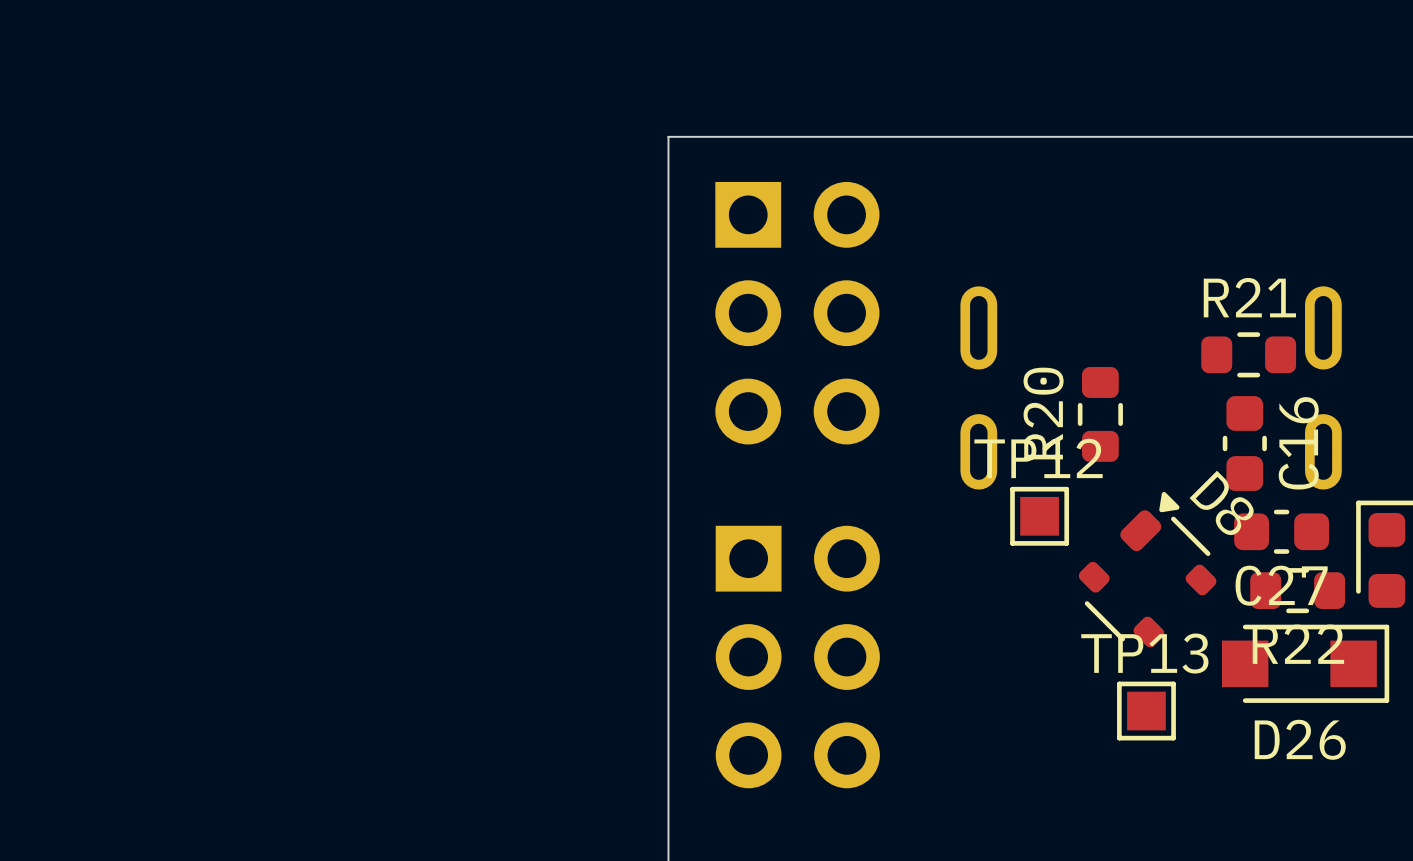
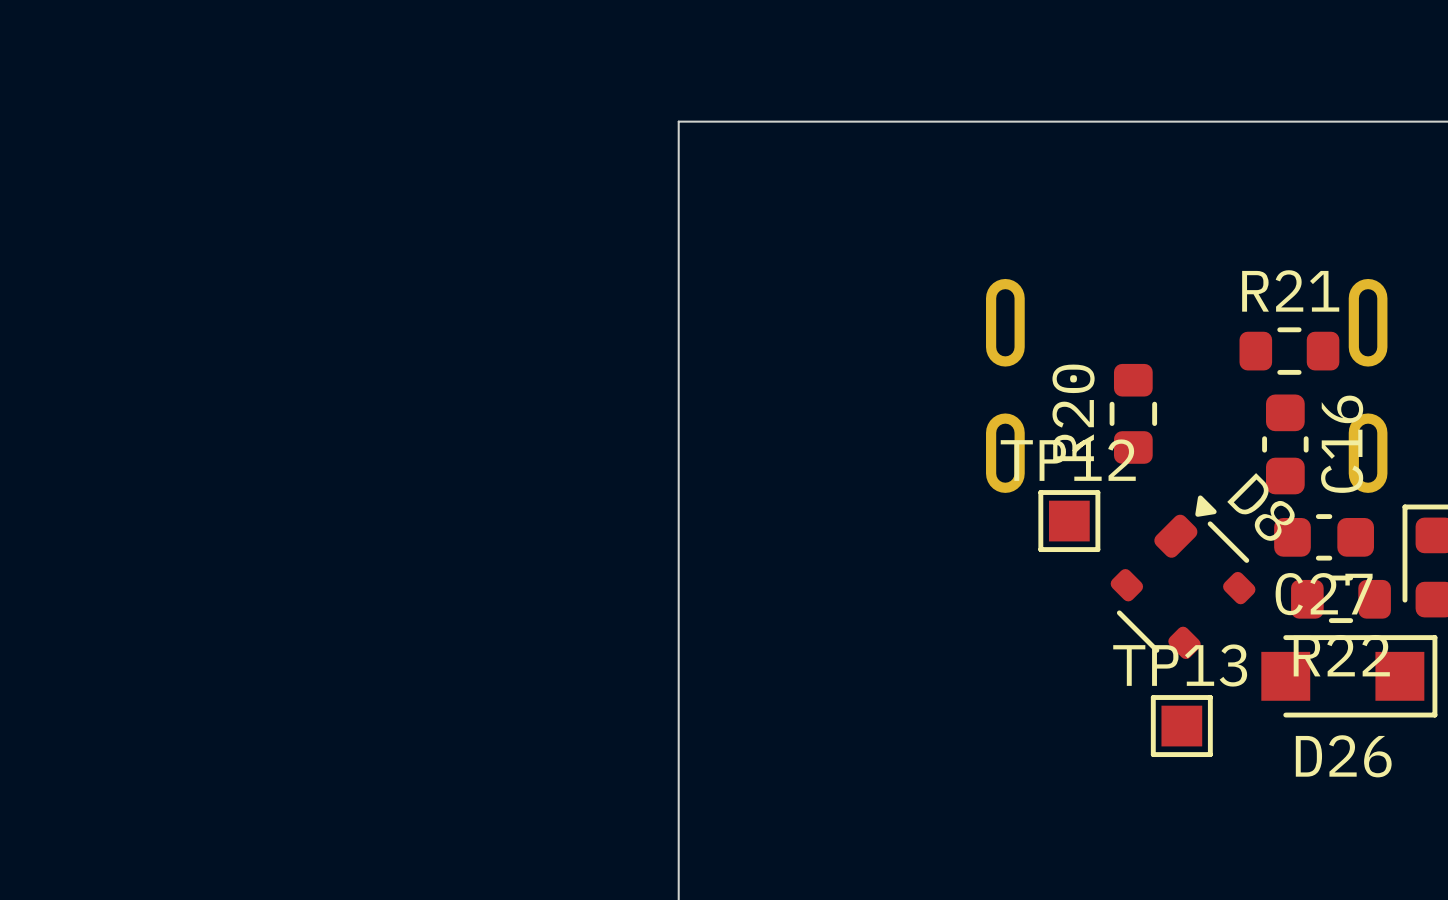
part: (797, 313) -> none
part: (797, 657) -> none

